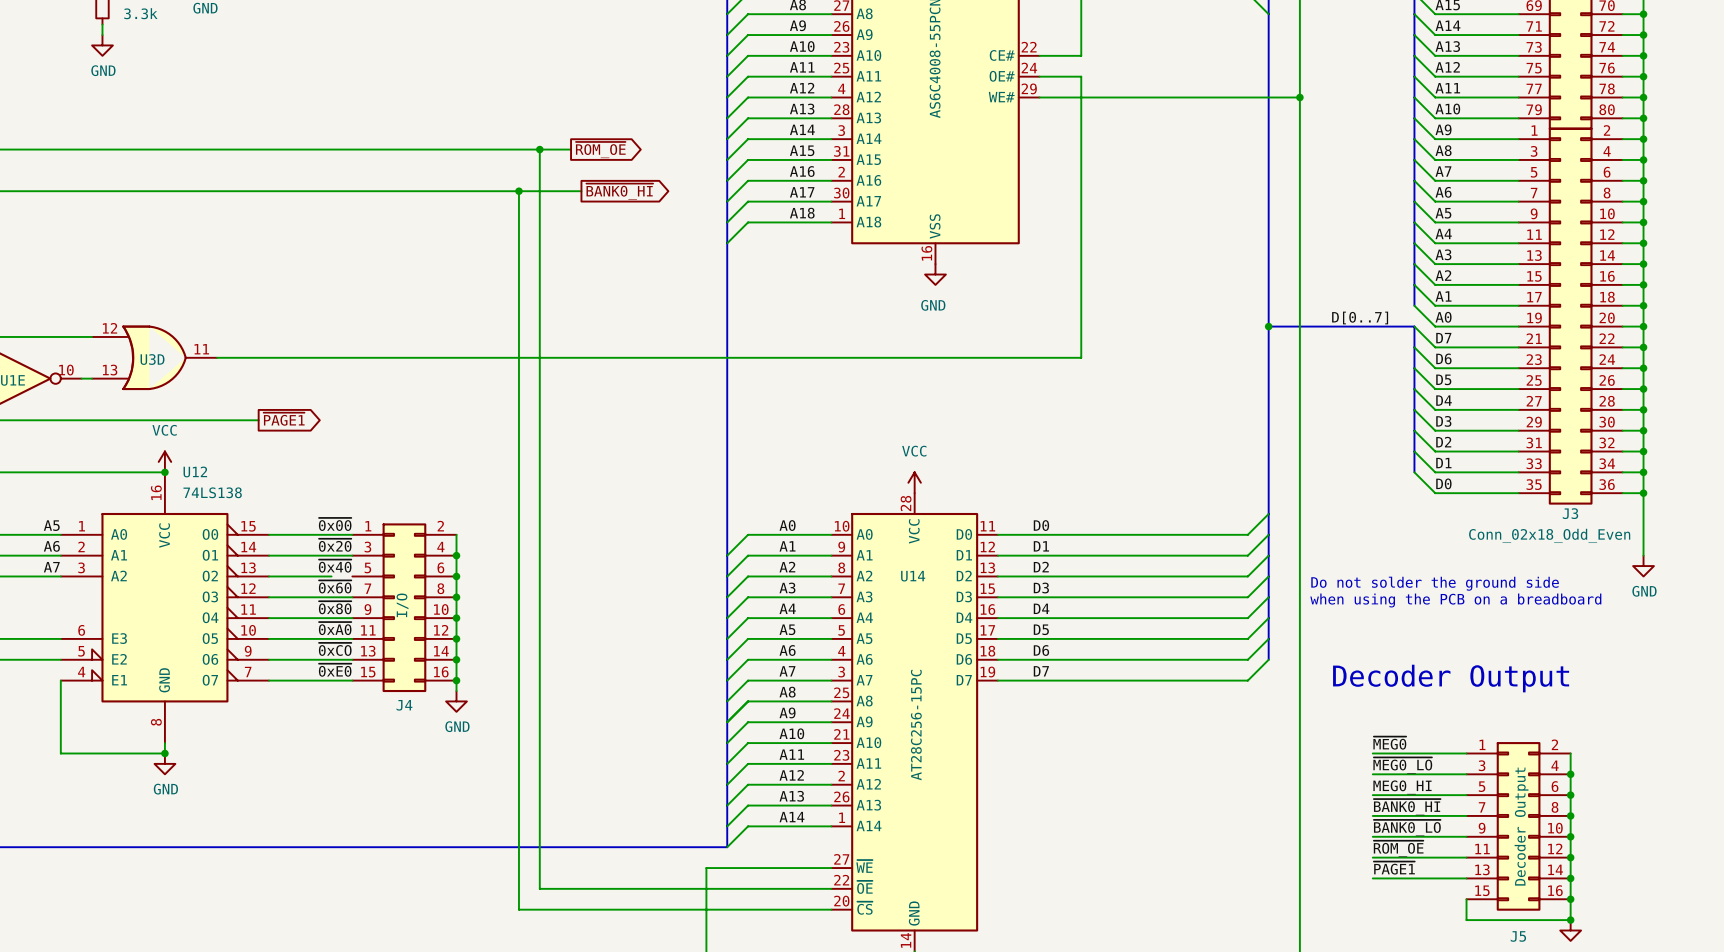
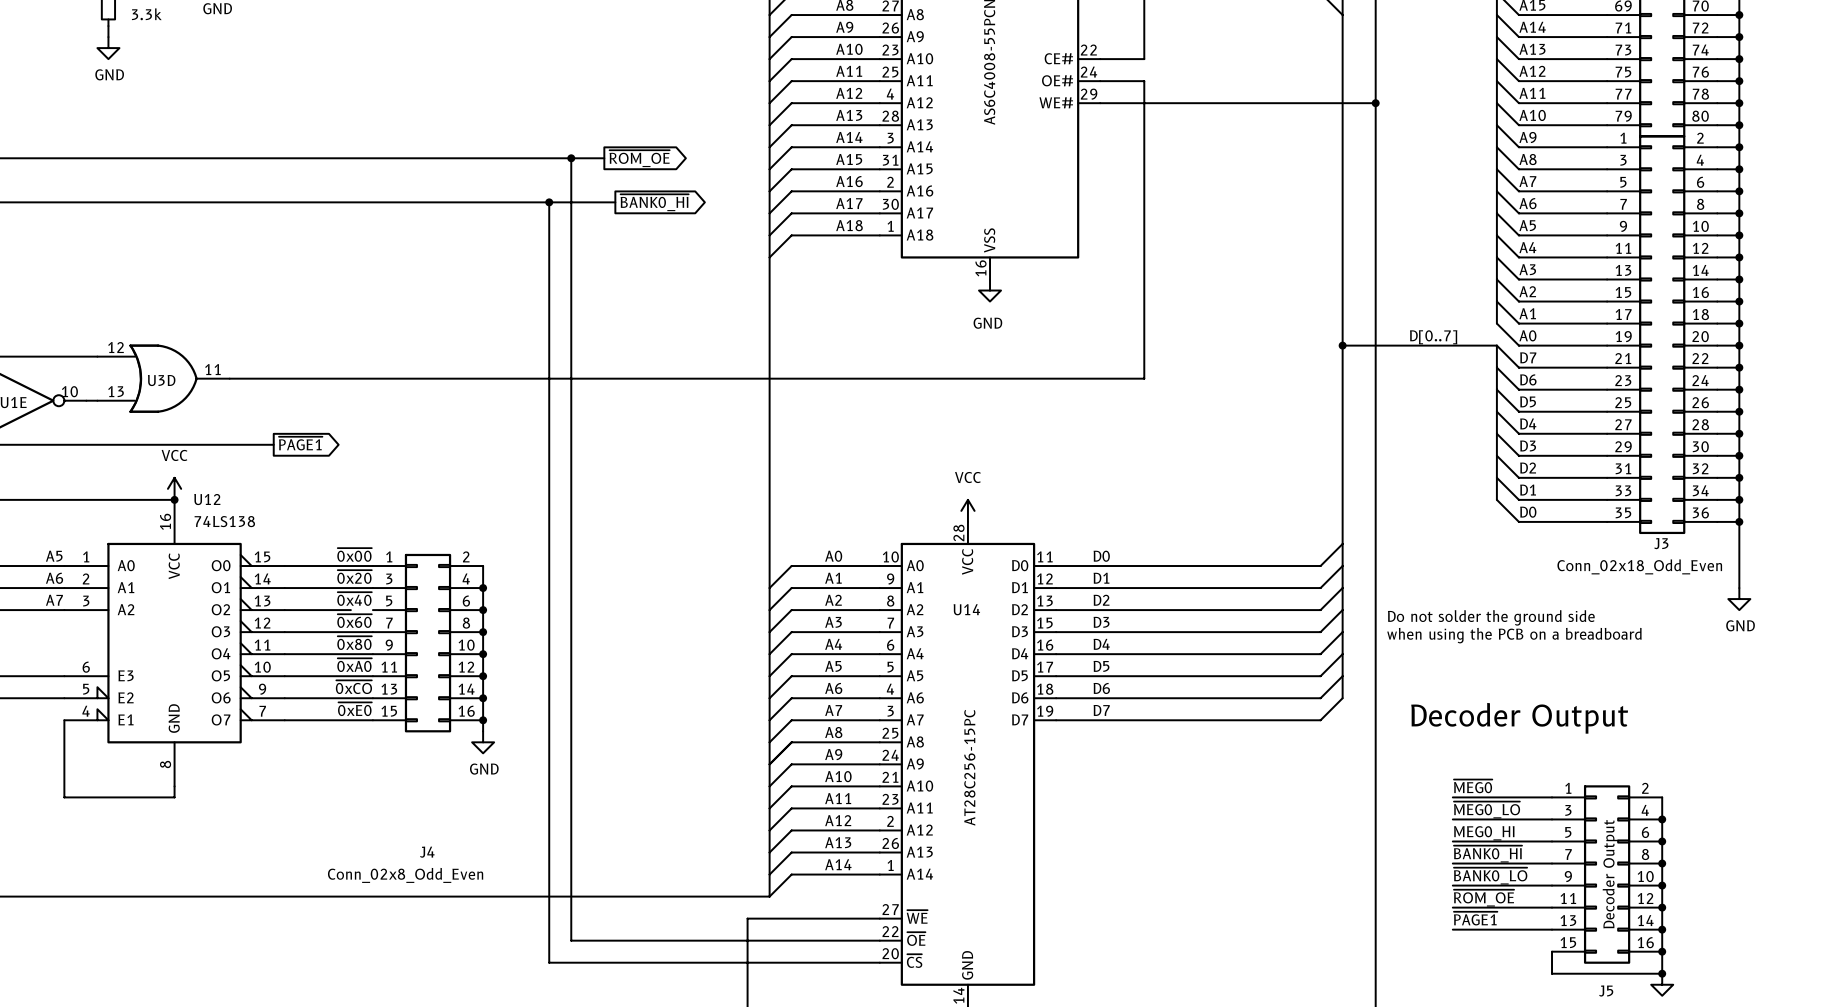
J4 value: I/O (402, 605) -> Conn_02x8_Odd_Even (405, 875)
J4 name position: J4 (404, 705) -> J4 (427, 852)
junction: (164, 753) -> none
power symbol: GND (164, 763) -> none

